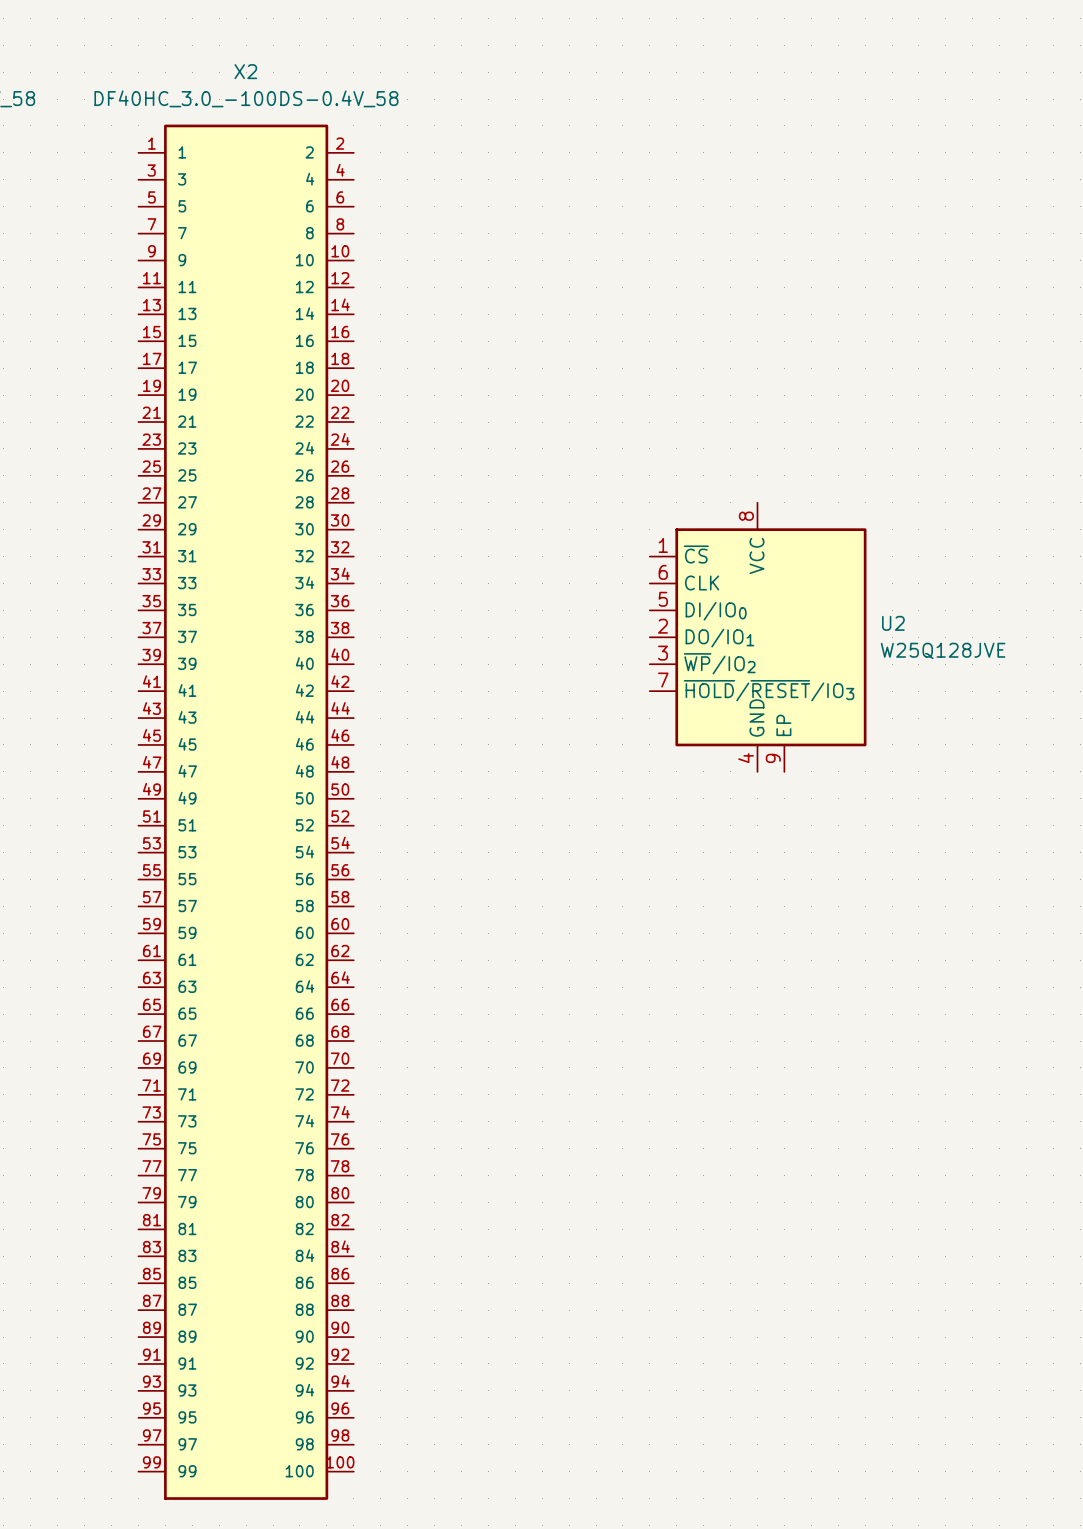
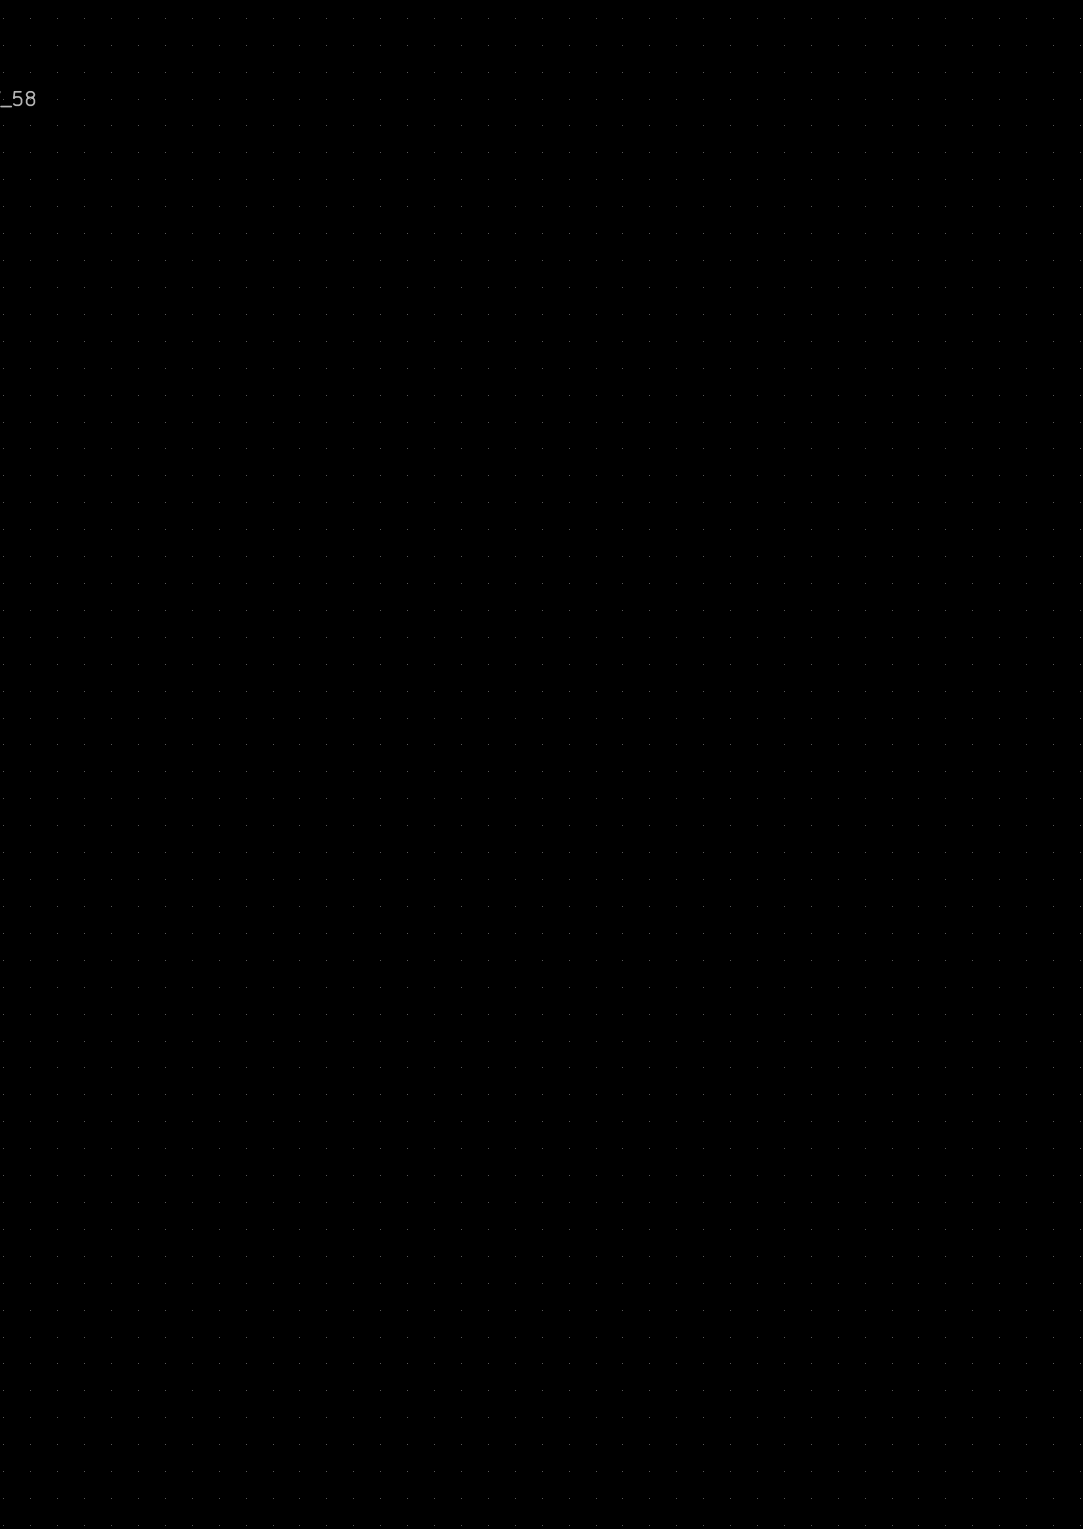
U2: W25Q128JVE (758, 637) -> none
X2: DF40HC_3.0_-100DS-0.4V_58 (246, 812) -> none

